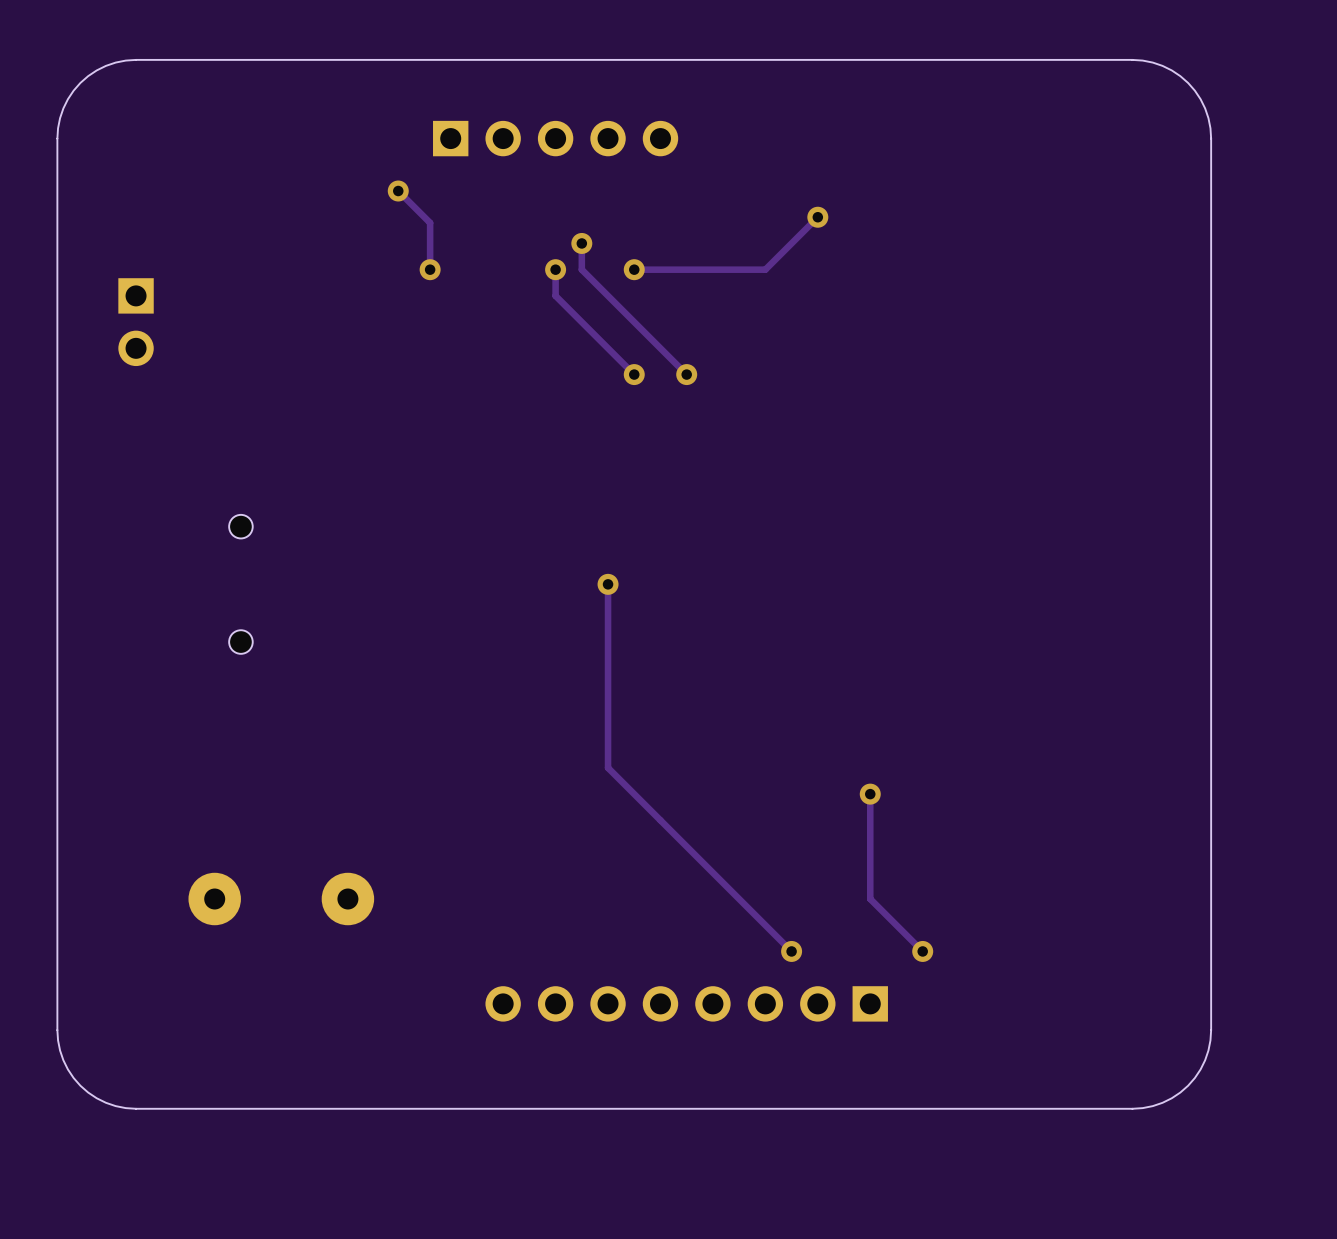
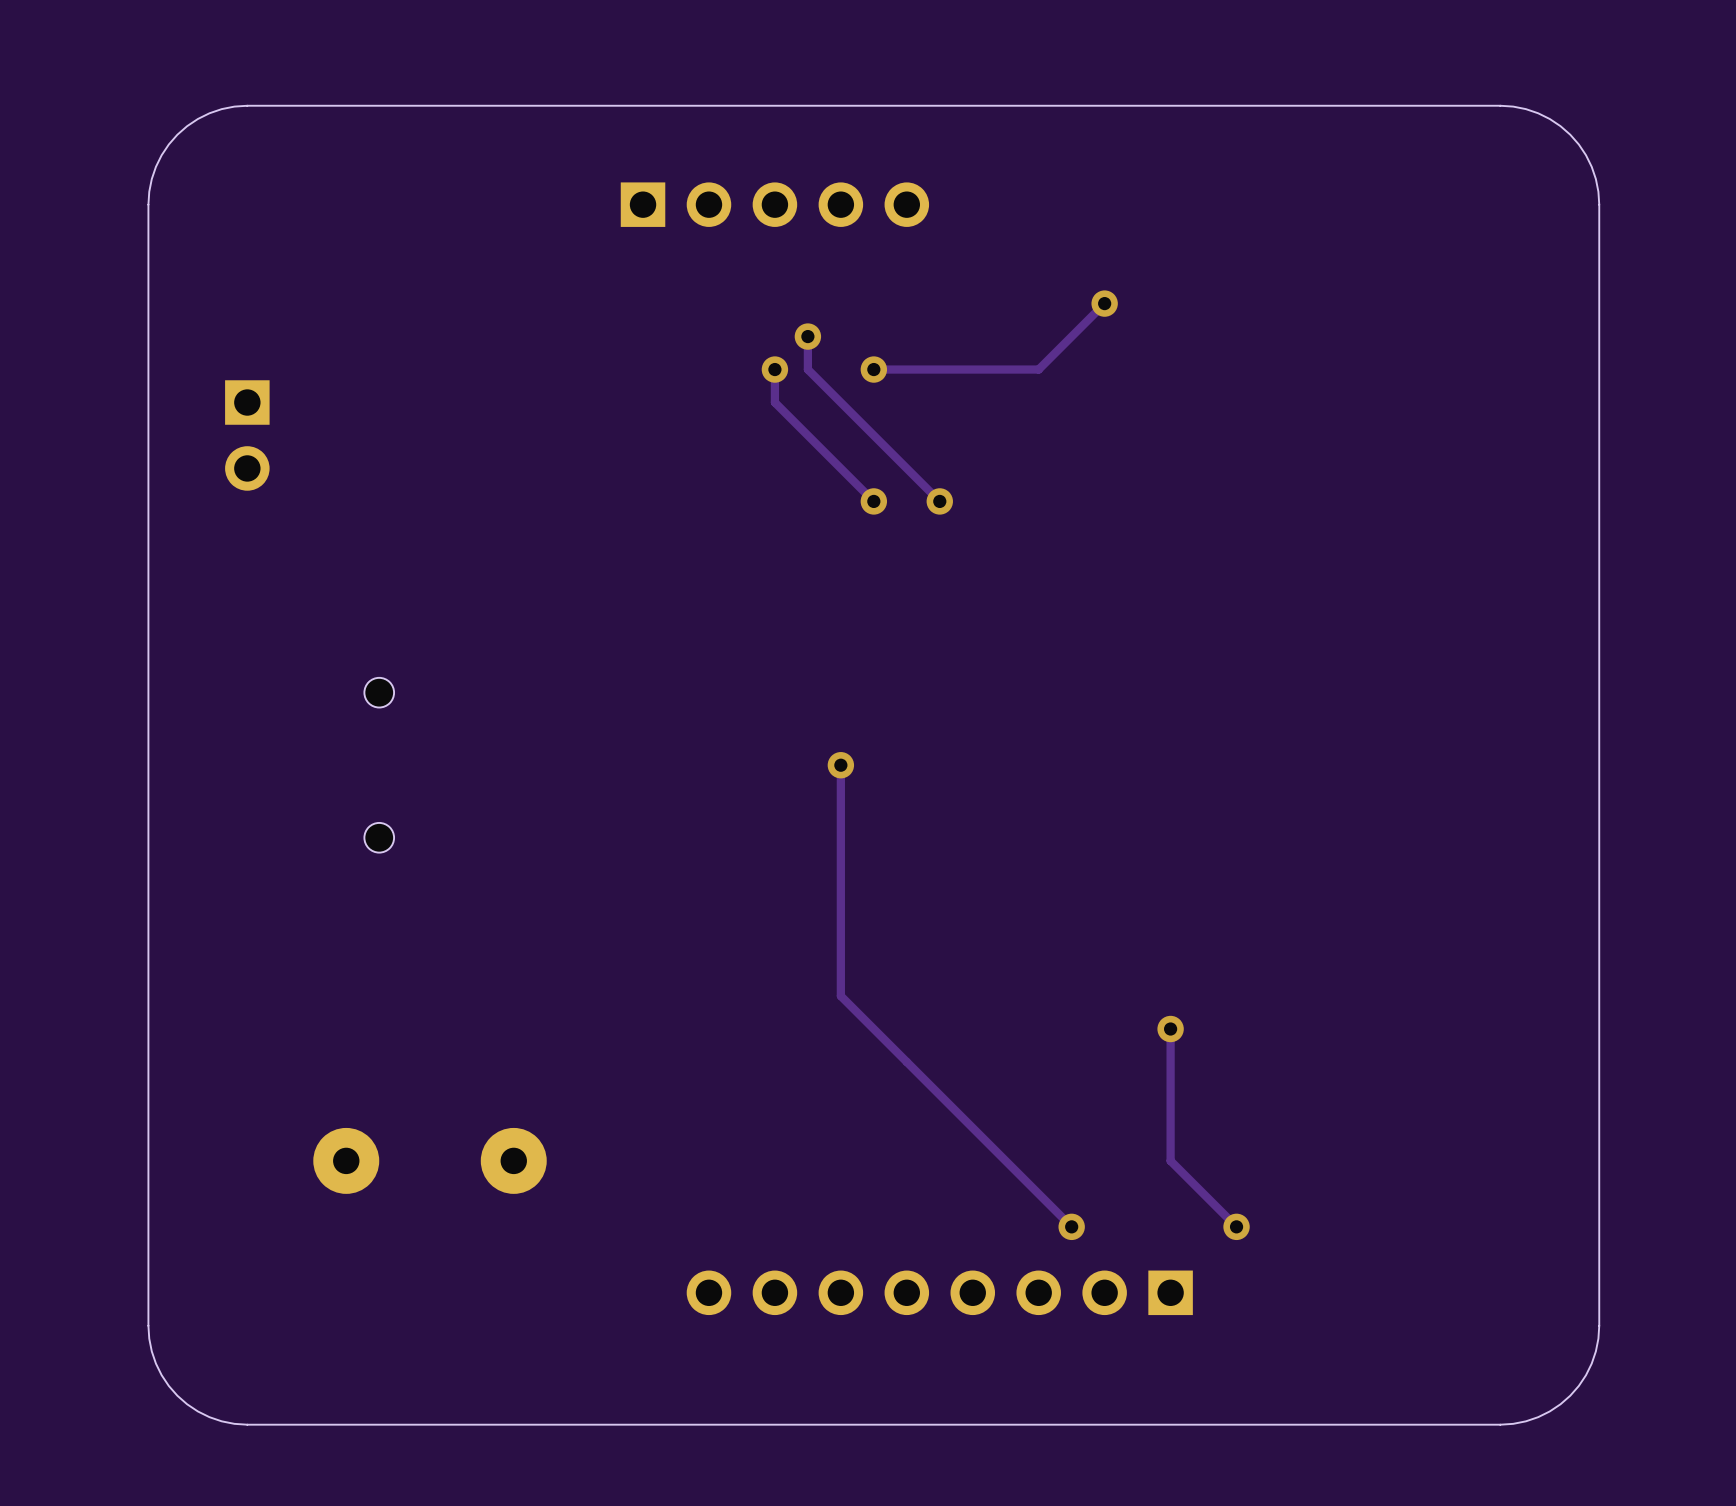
track: (398, 191) (430, 222) (430, 269) -> none
via: (398, 191) -> none
via: (430, 269) -> none

